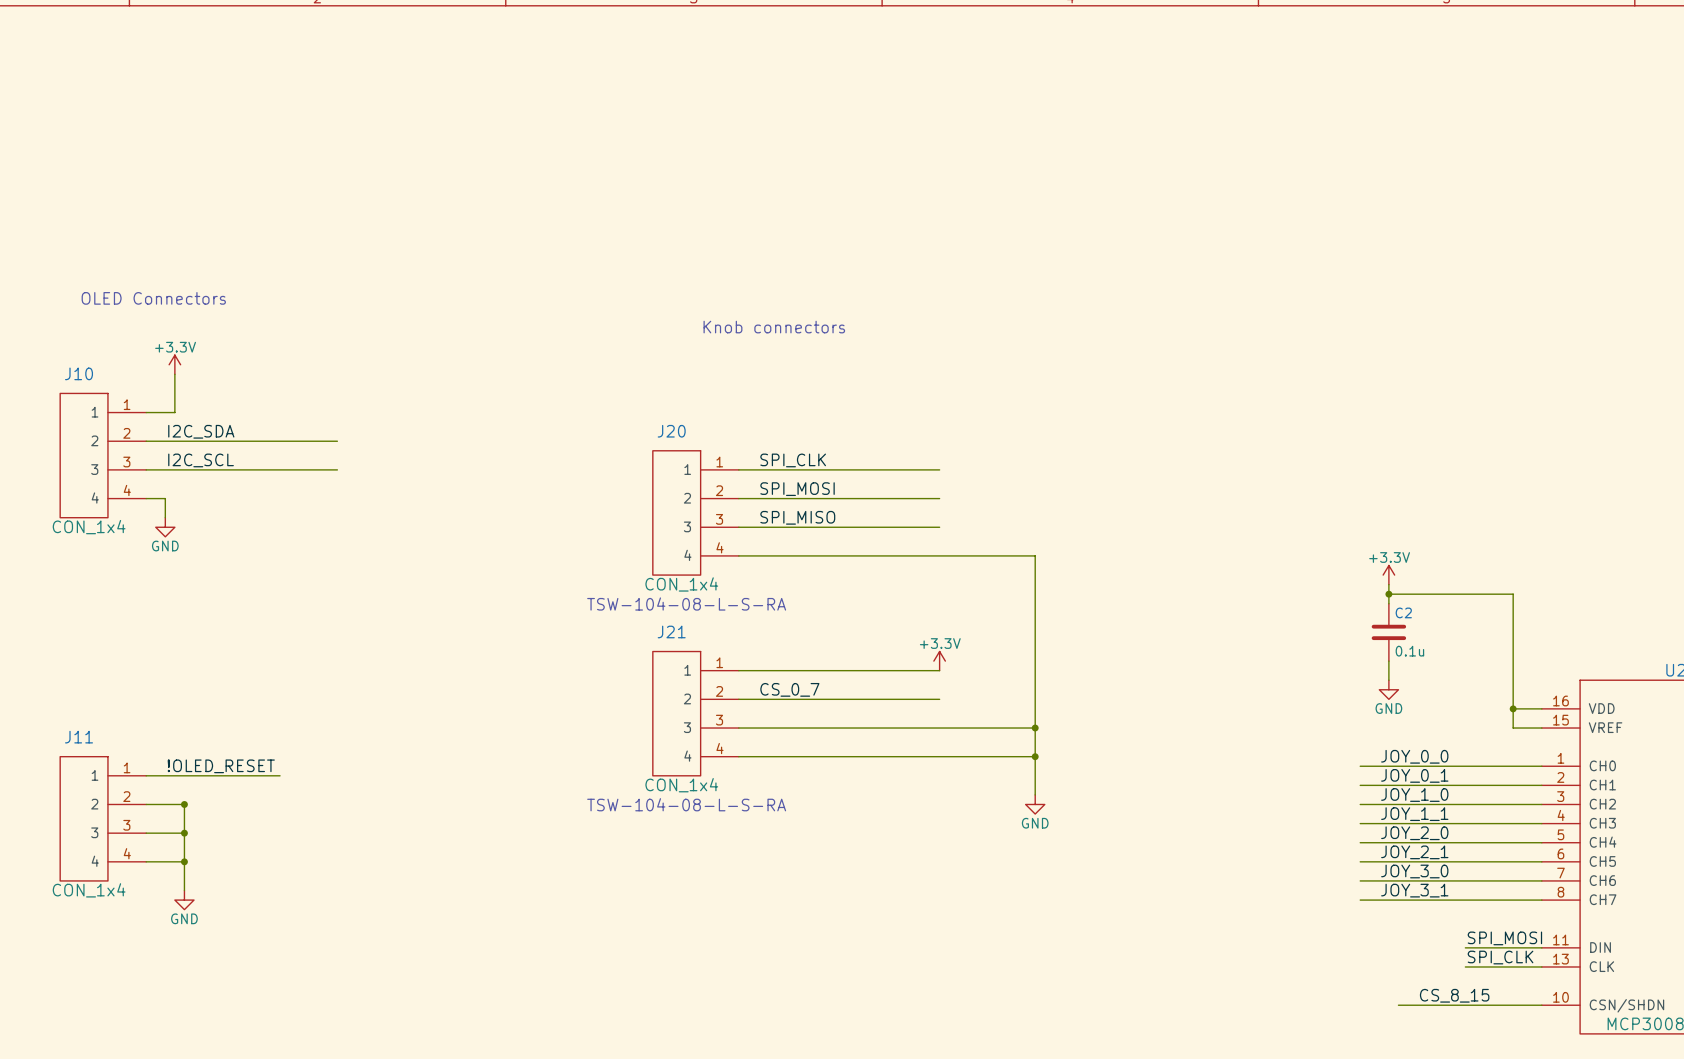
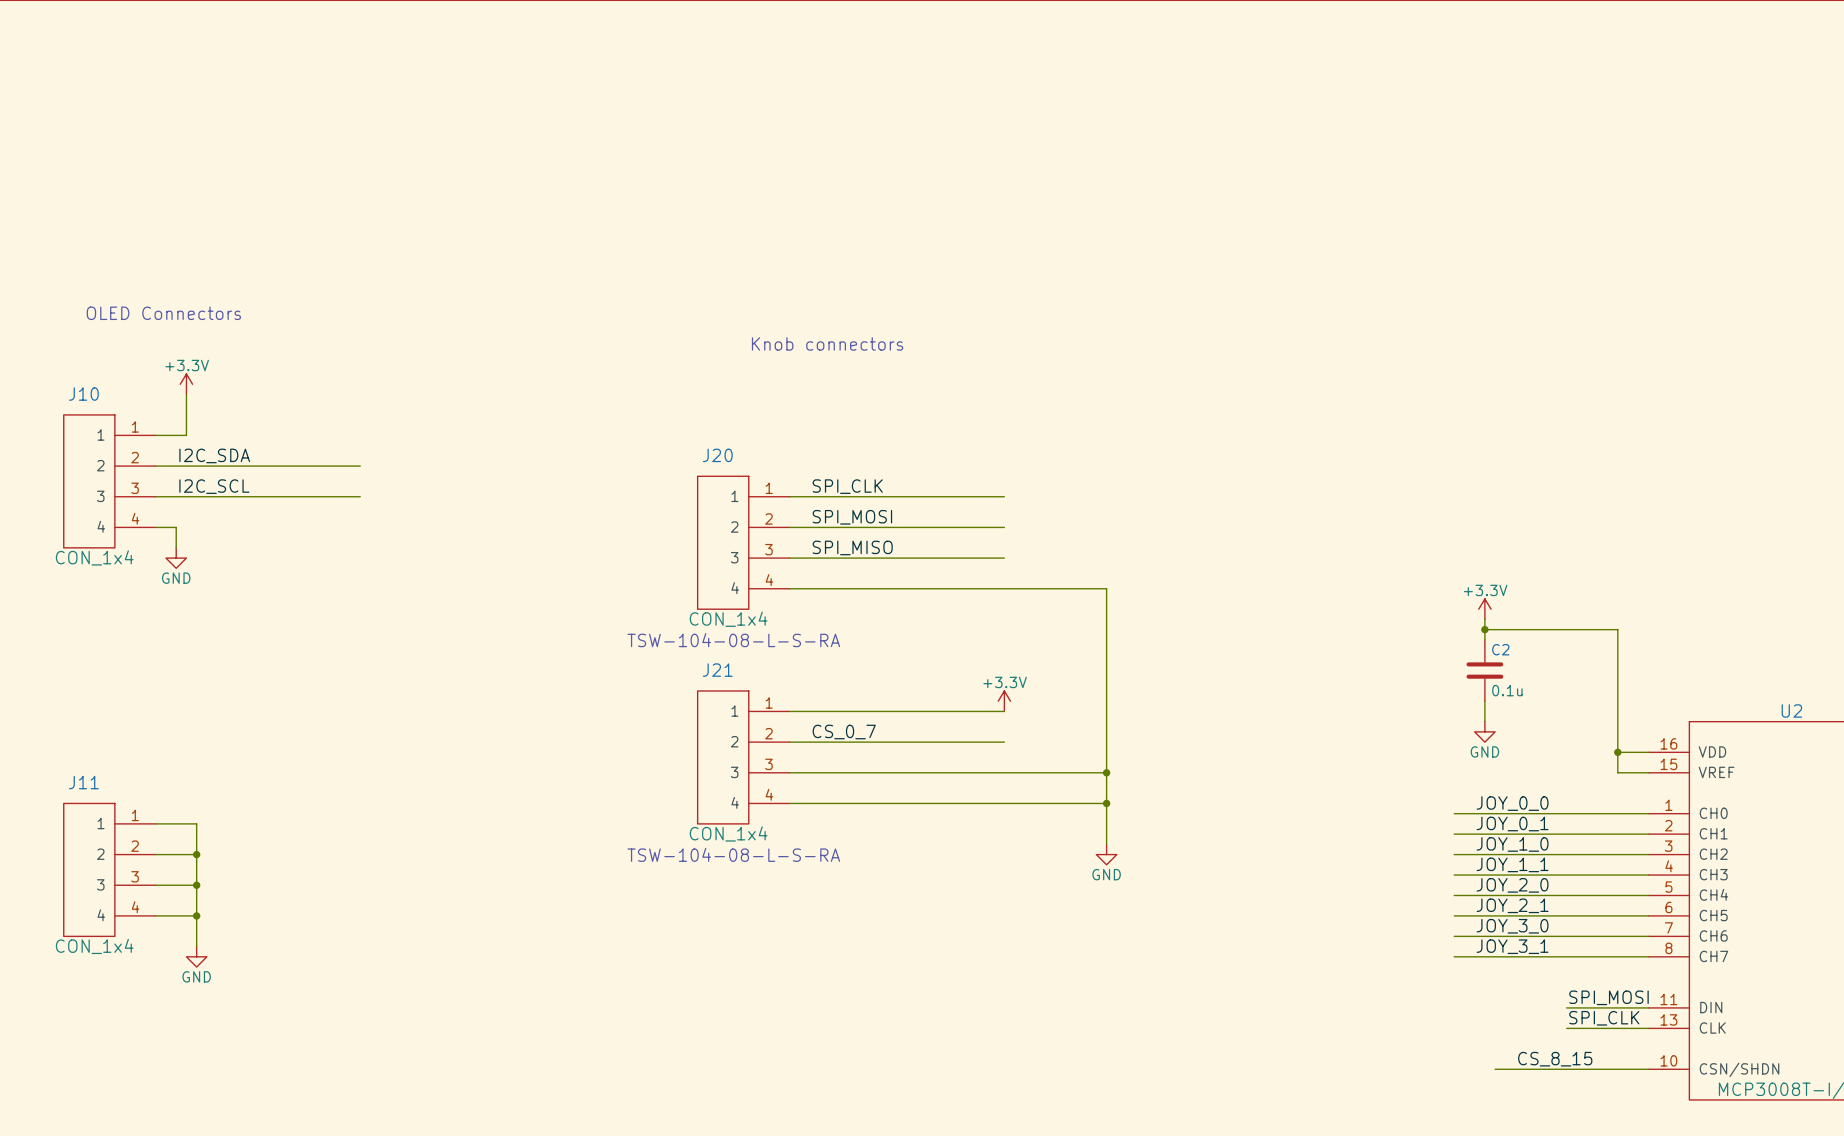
label: !OLED_RESET (221, 766) -> none
wire: (184, 775) (280, 775) -> (196, 823) (196, 854)

